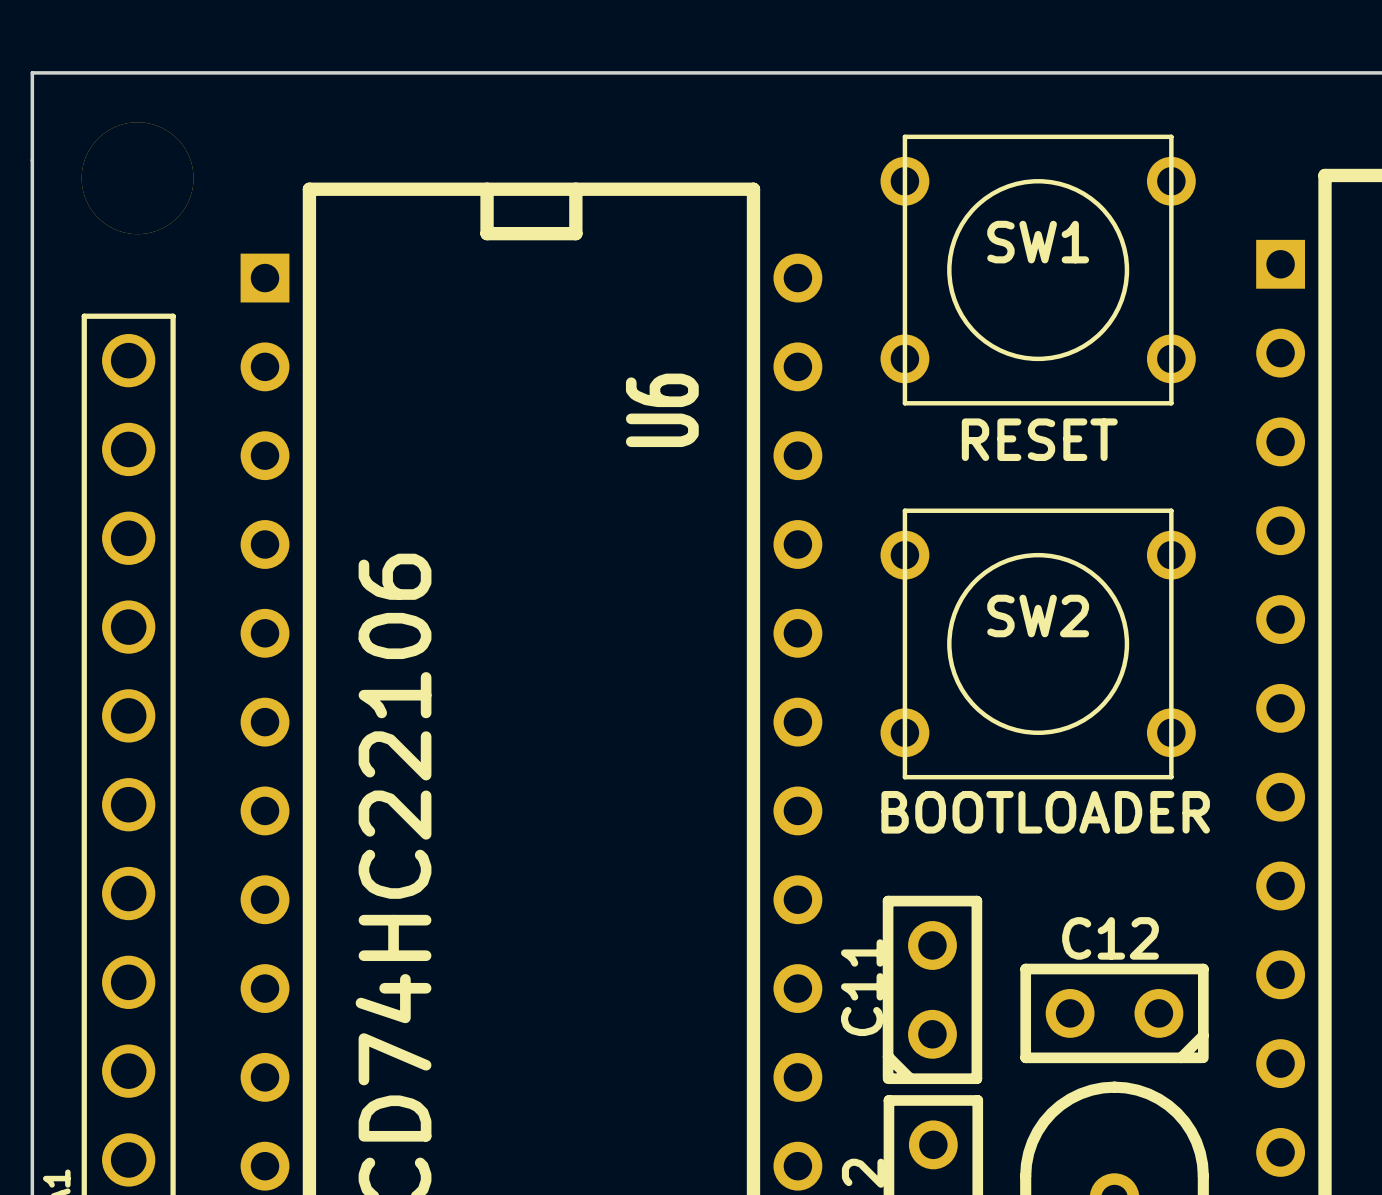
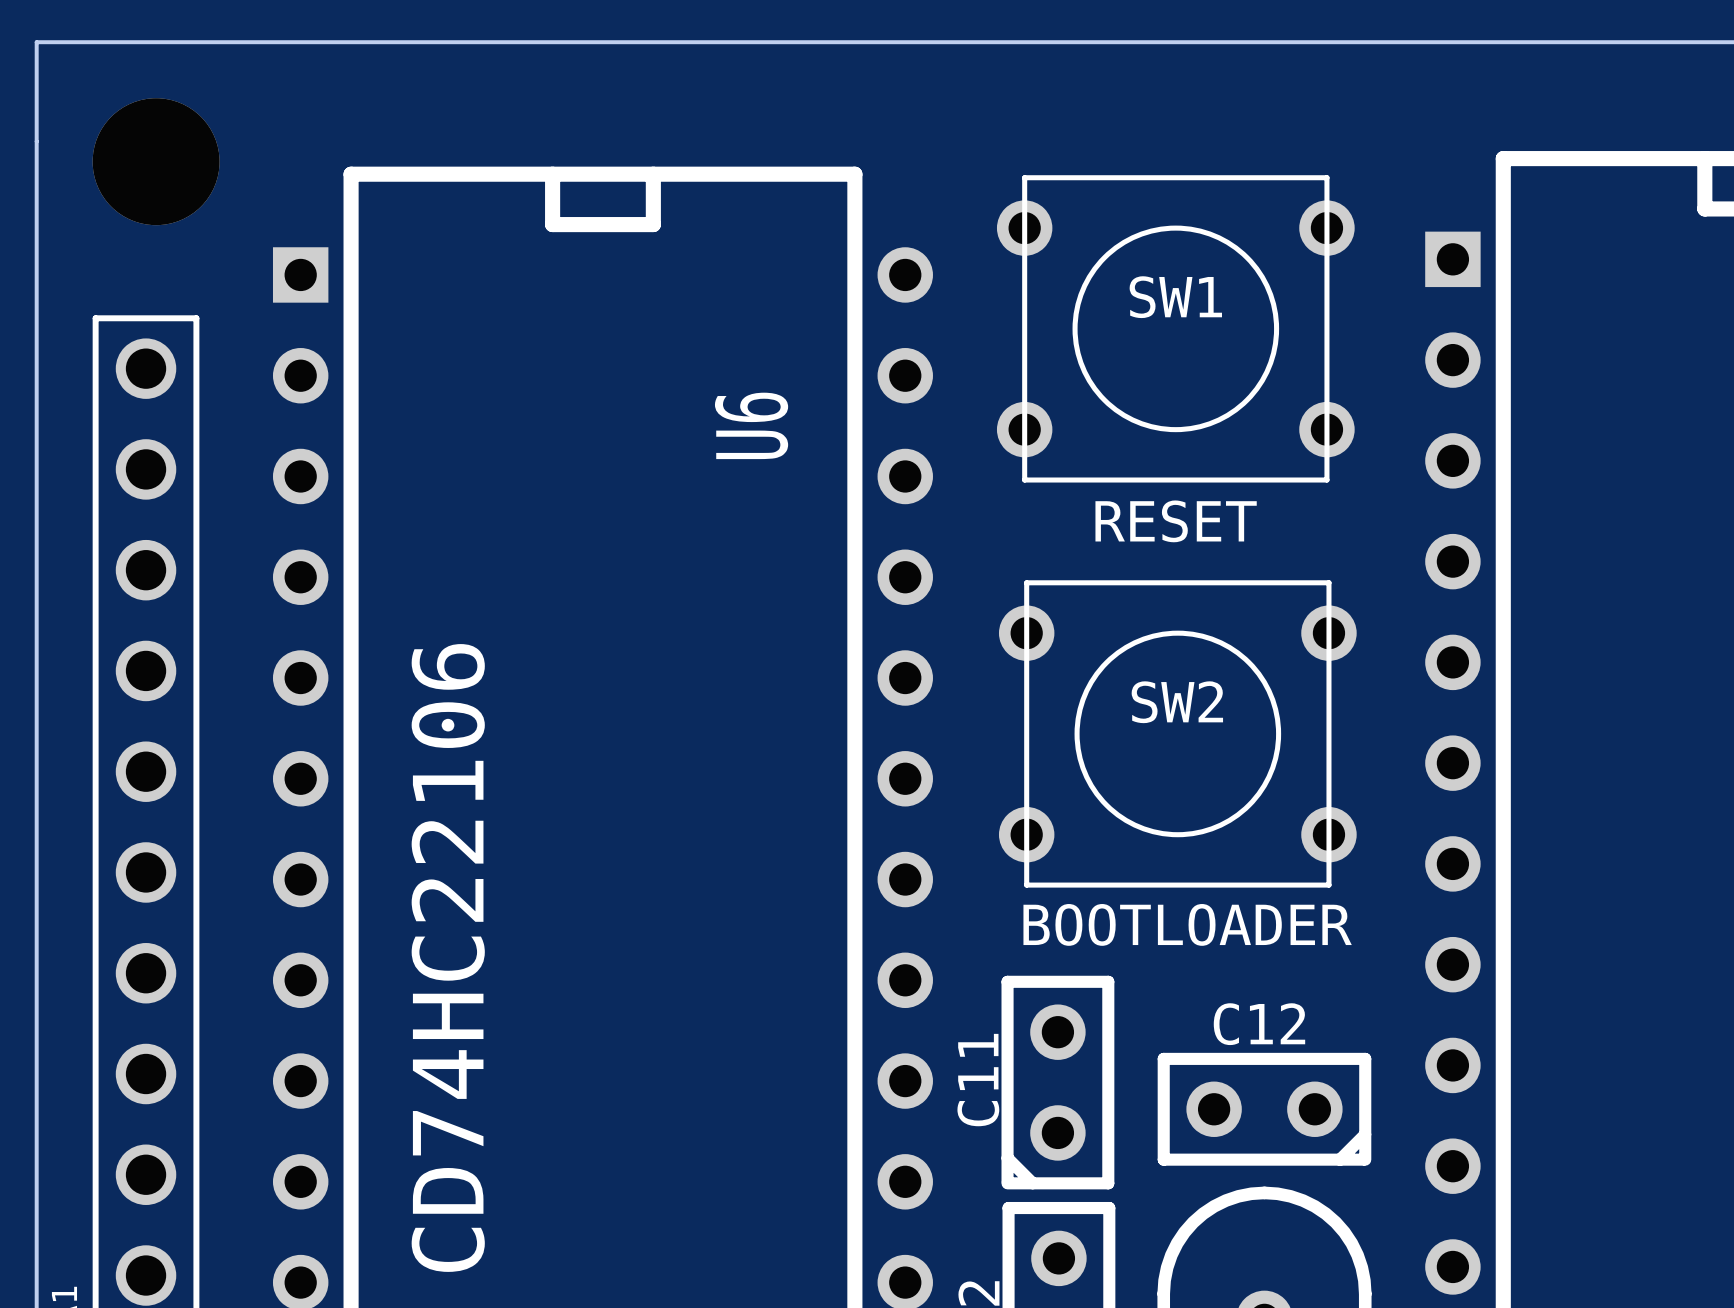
SW1 position: (1038, 270) -> (1175, 328)
SW2 position: (1038, 643) -> (1177, 733)

